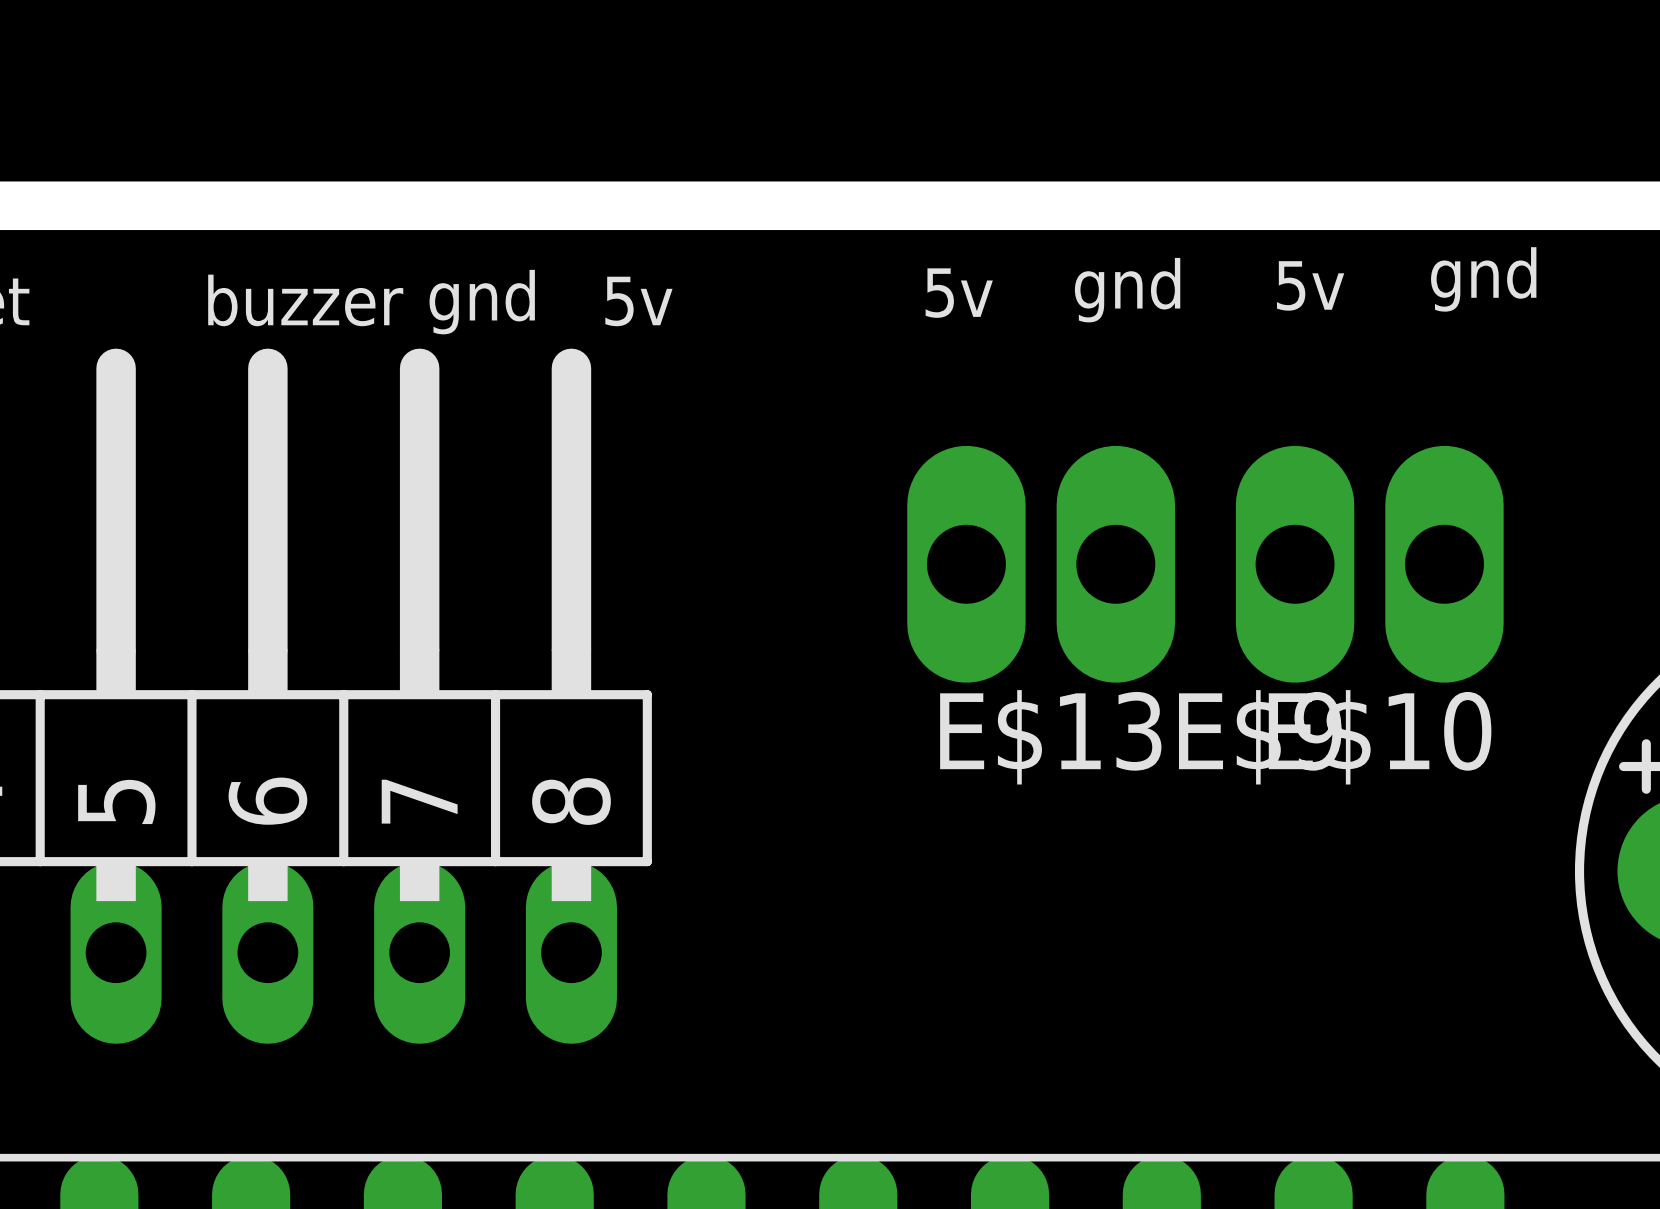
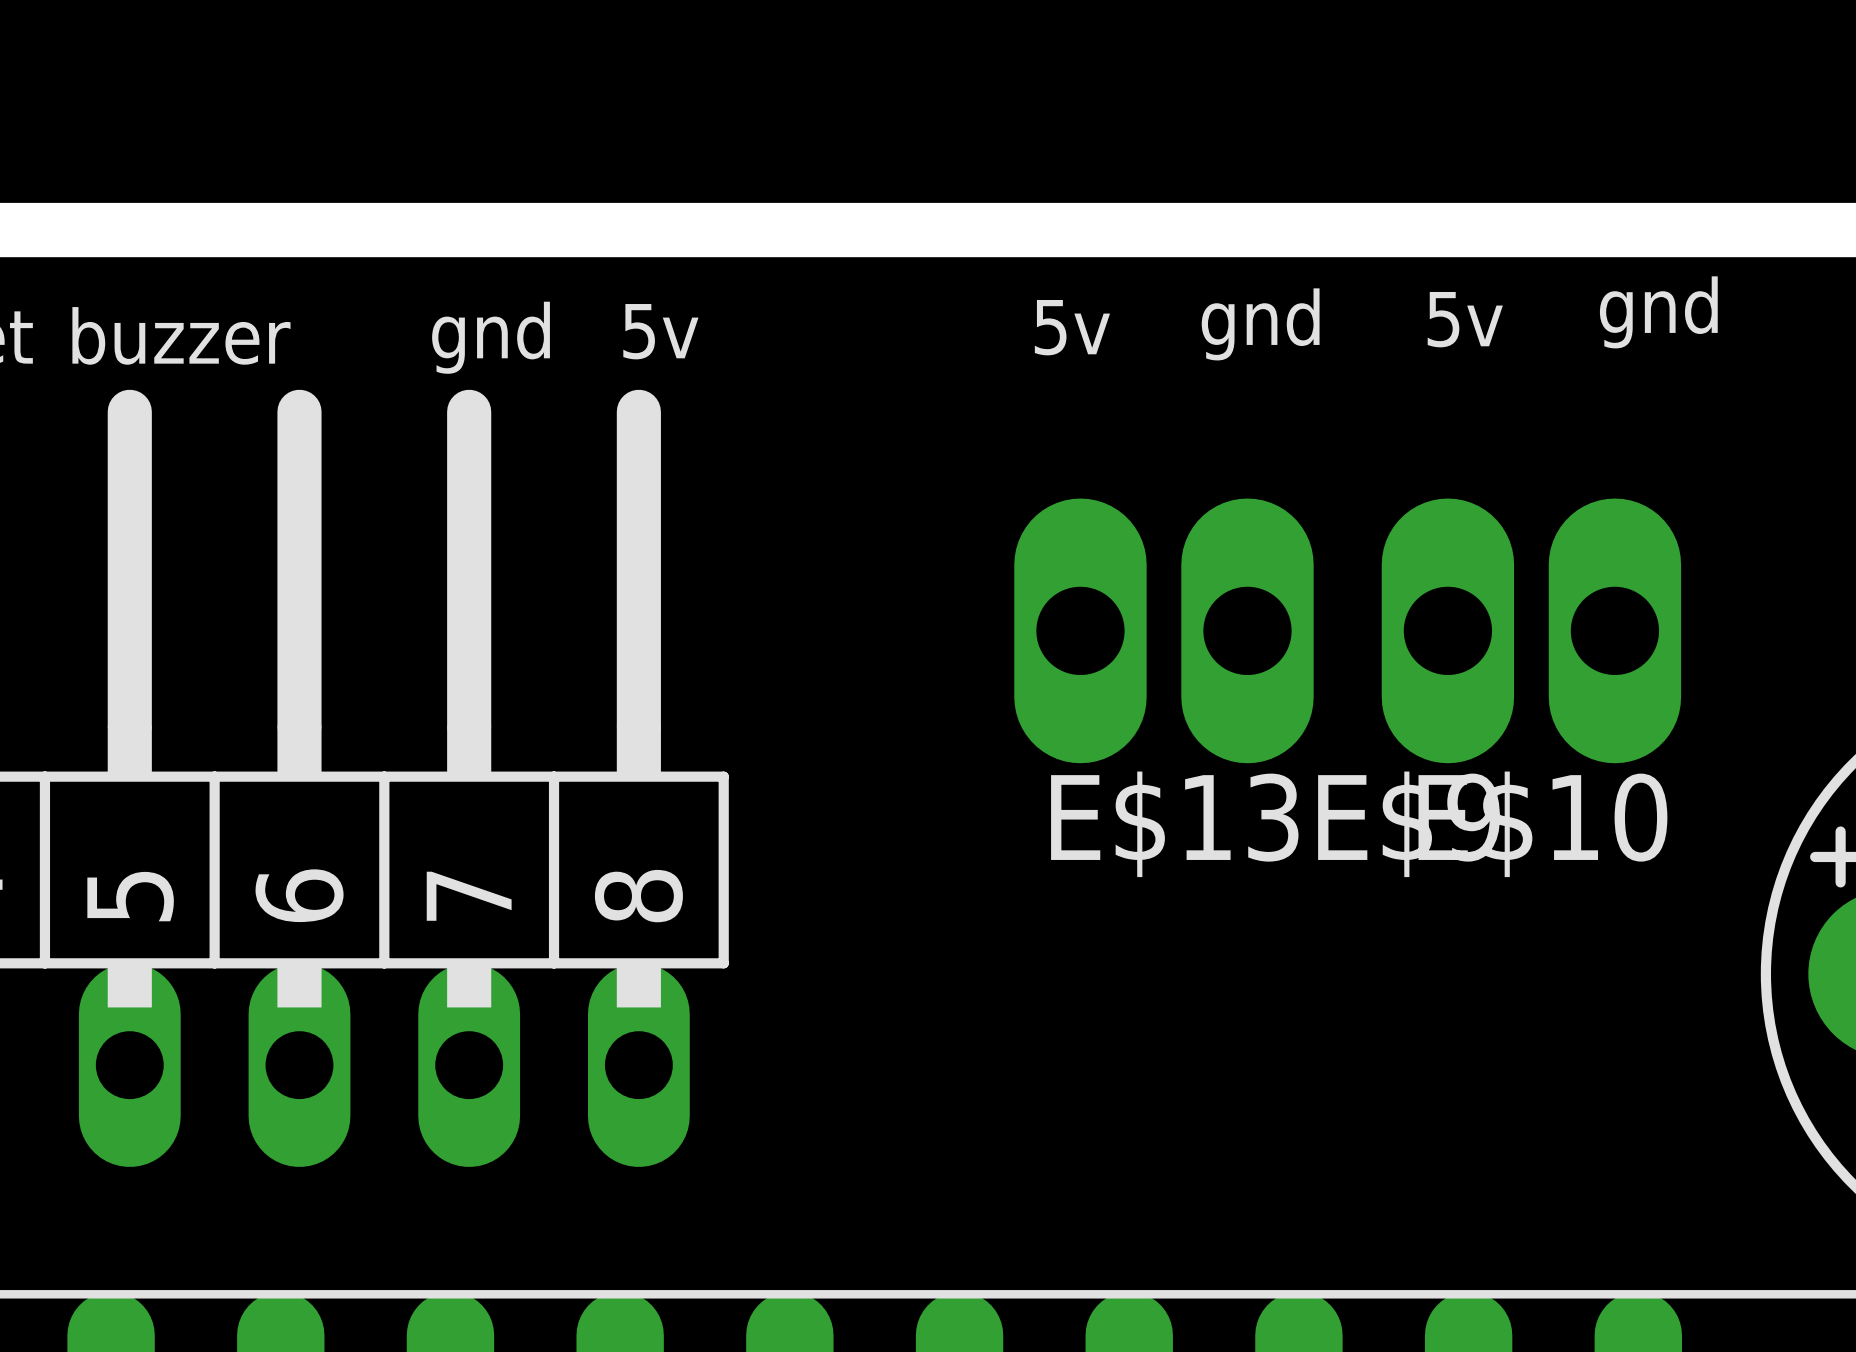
text position: buzzer (305, 300) -> buzzer (181, 335)
text position: 5v (638, 301) -> 5v (660, 331)
text position: gnd (482, 302) -> gnd (491, 337)

